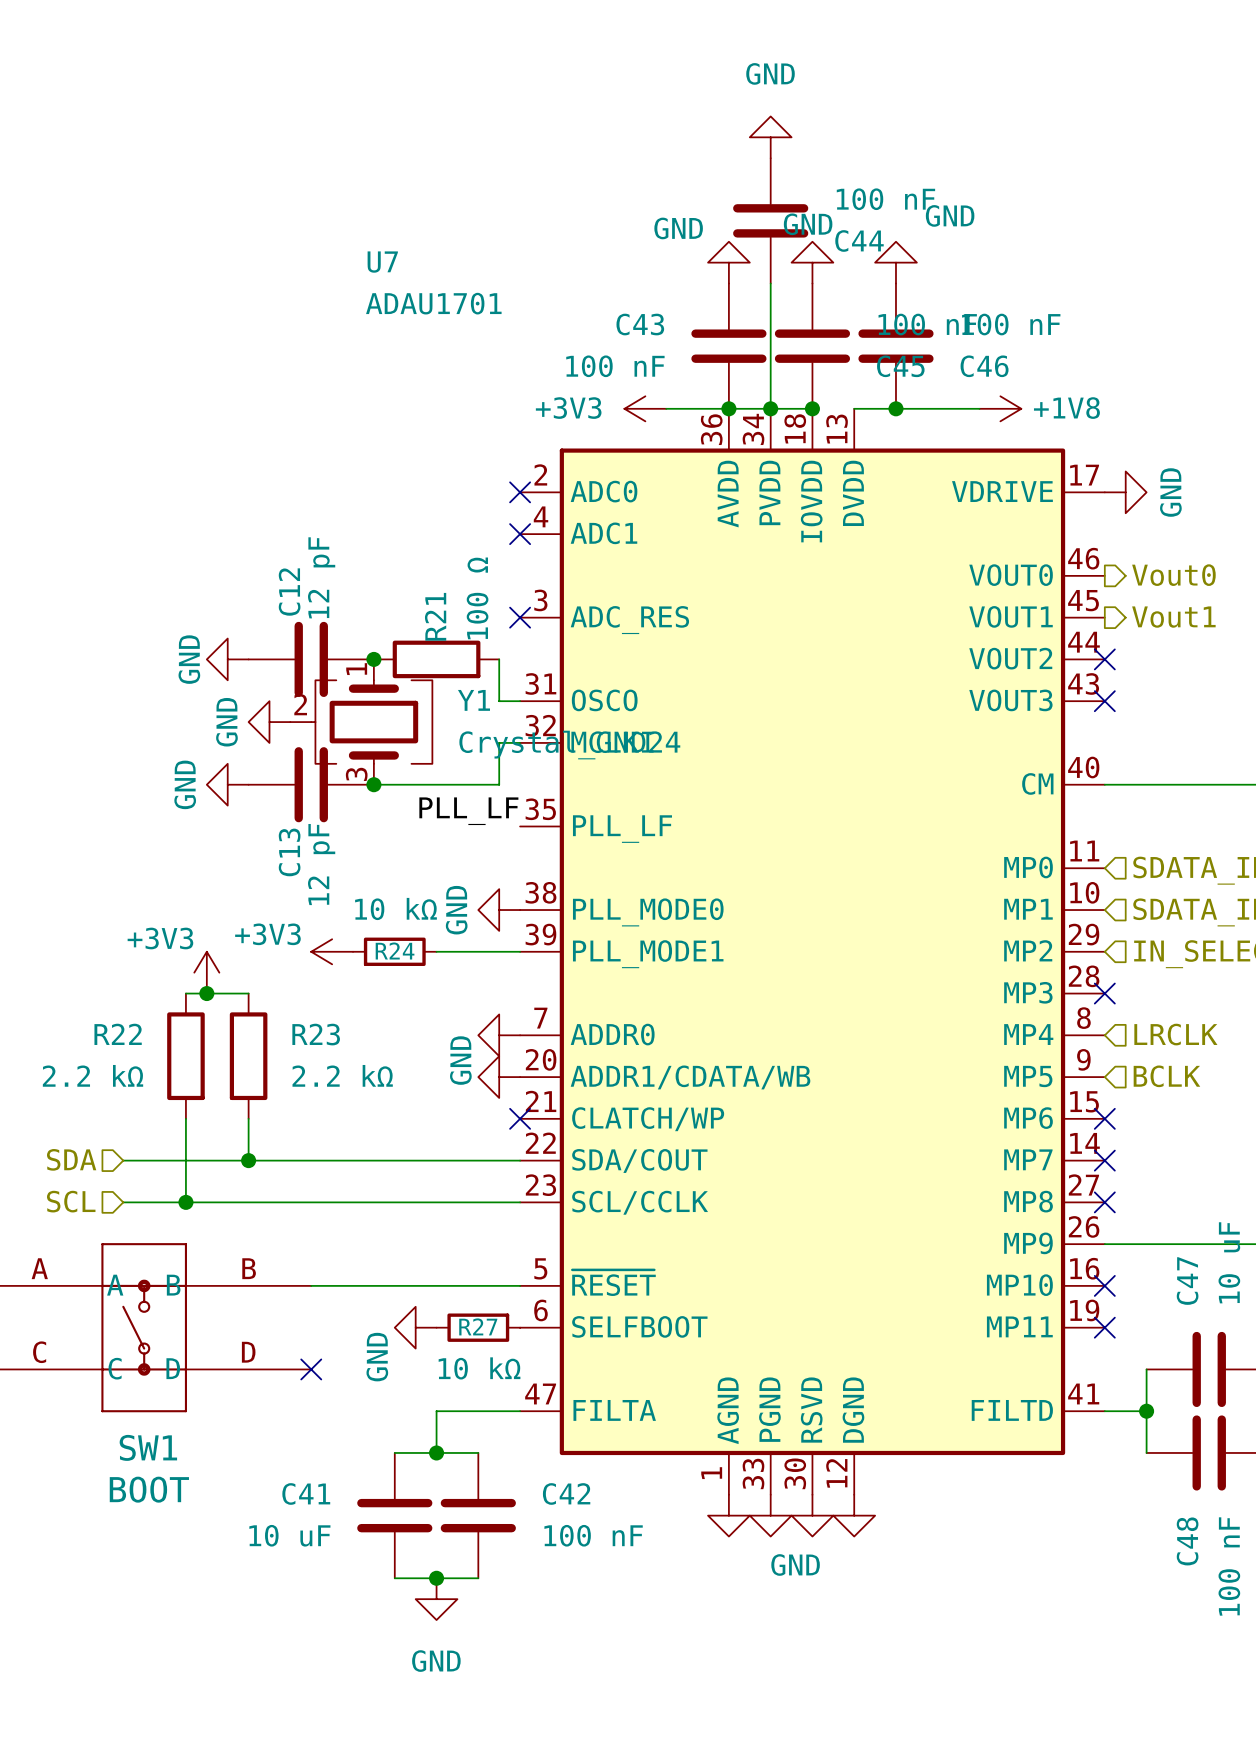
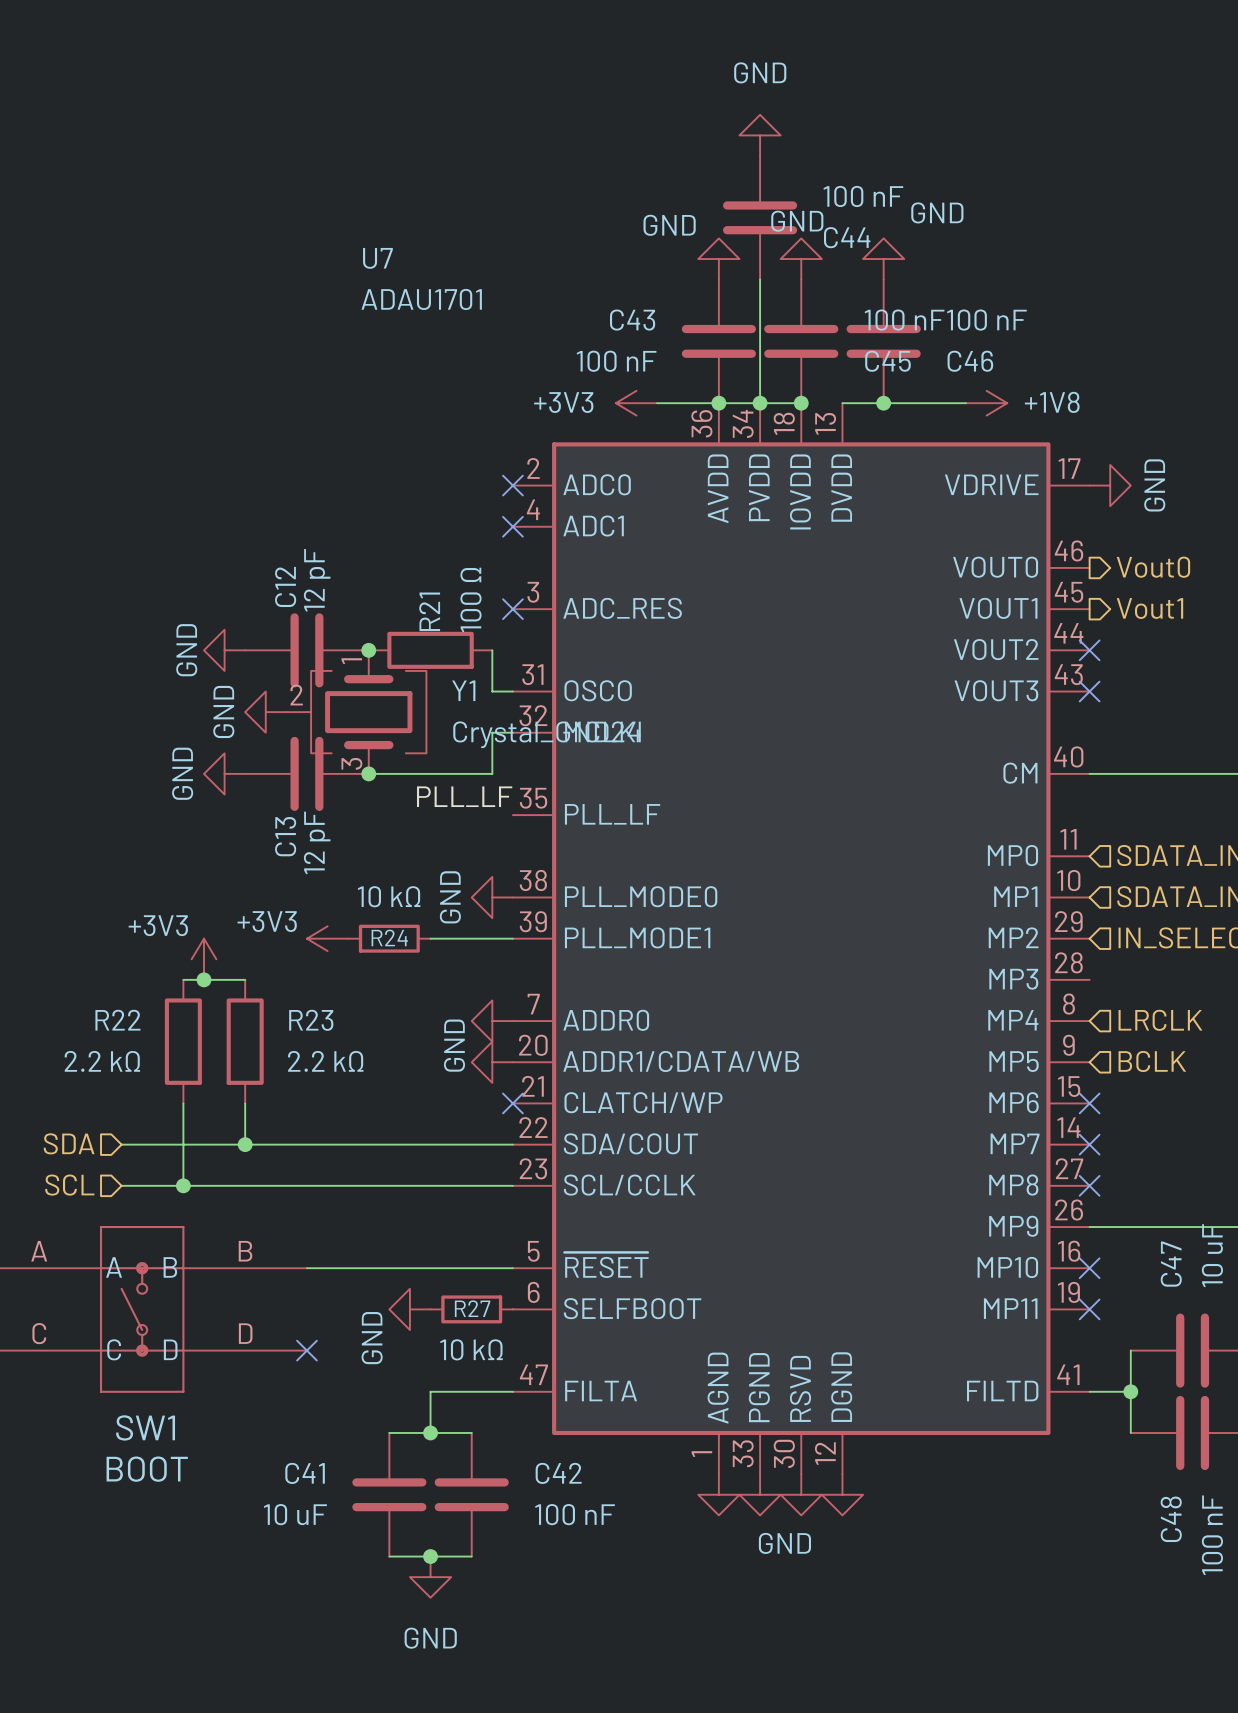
no-connect mark: (1104, 993) -> none

